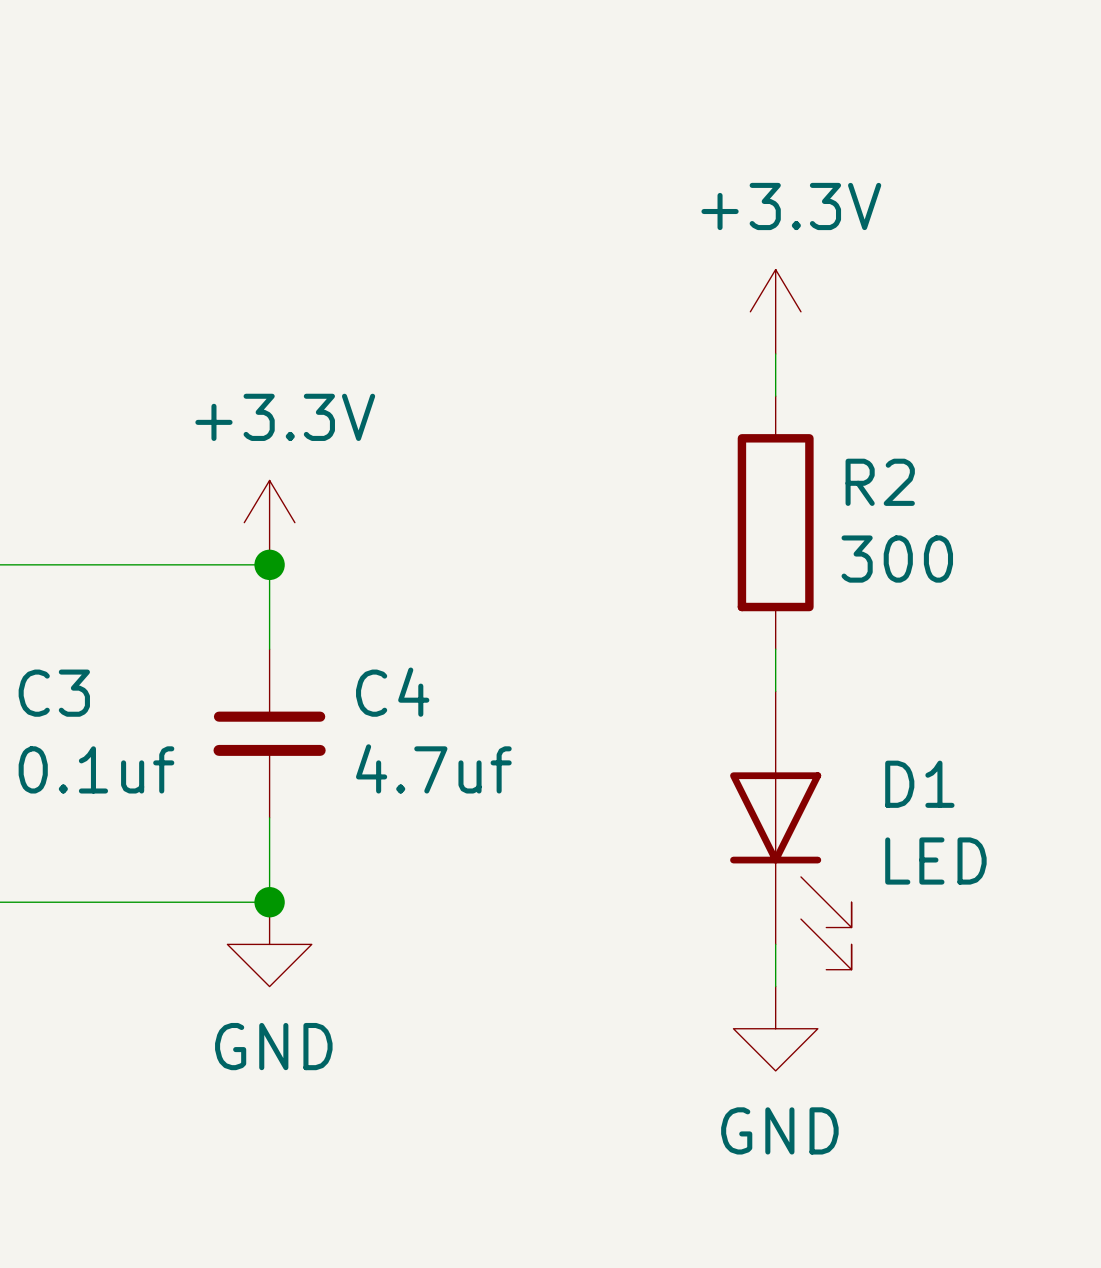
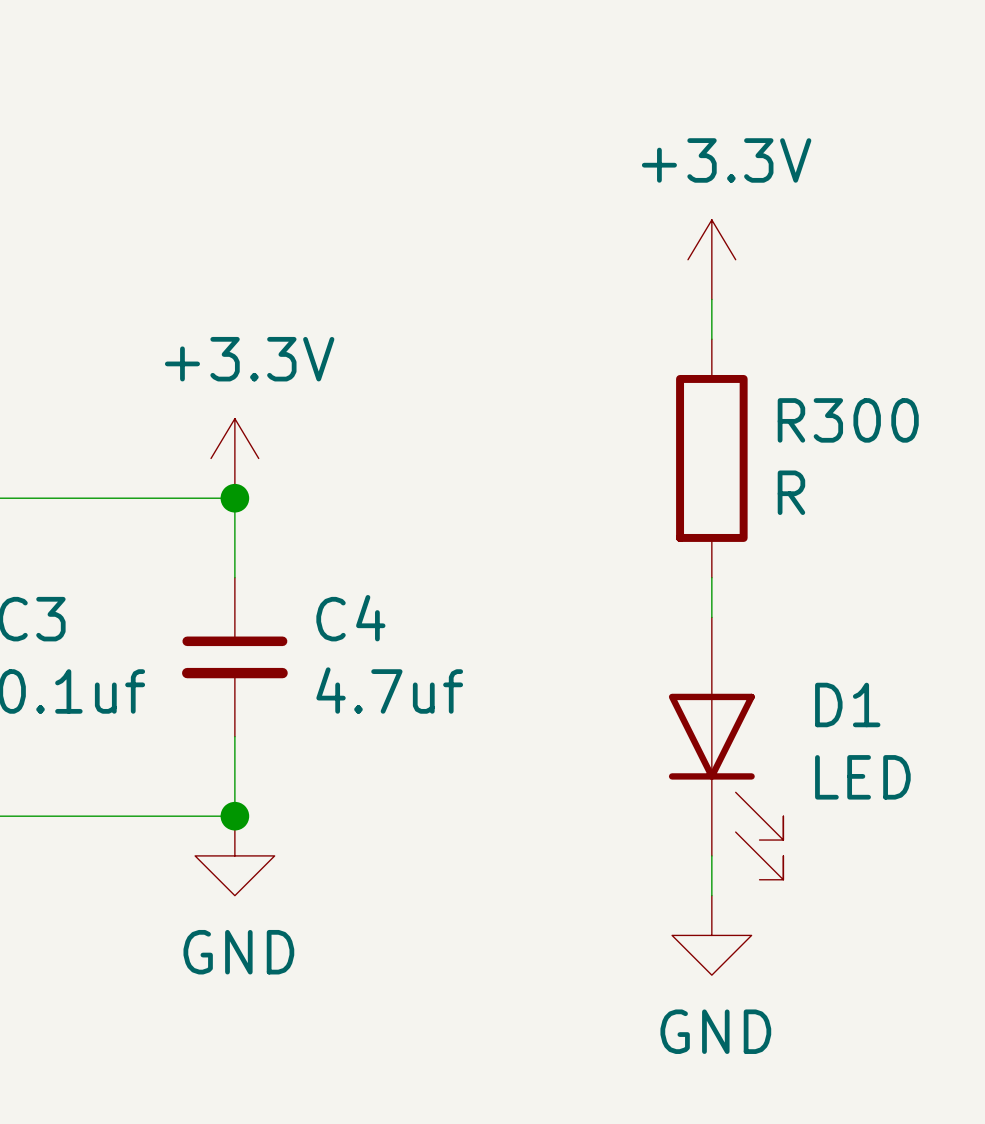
R2 name: R2 (880, 482) -> R300 (848, 420)
R2 value: 300 (897, 559) -> R (791, 492)

